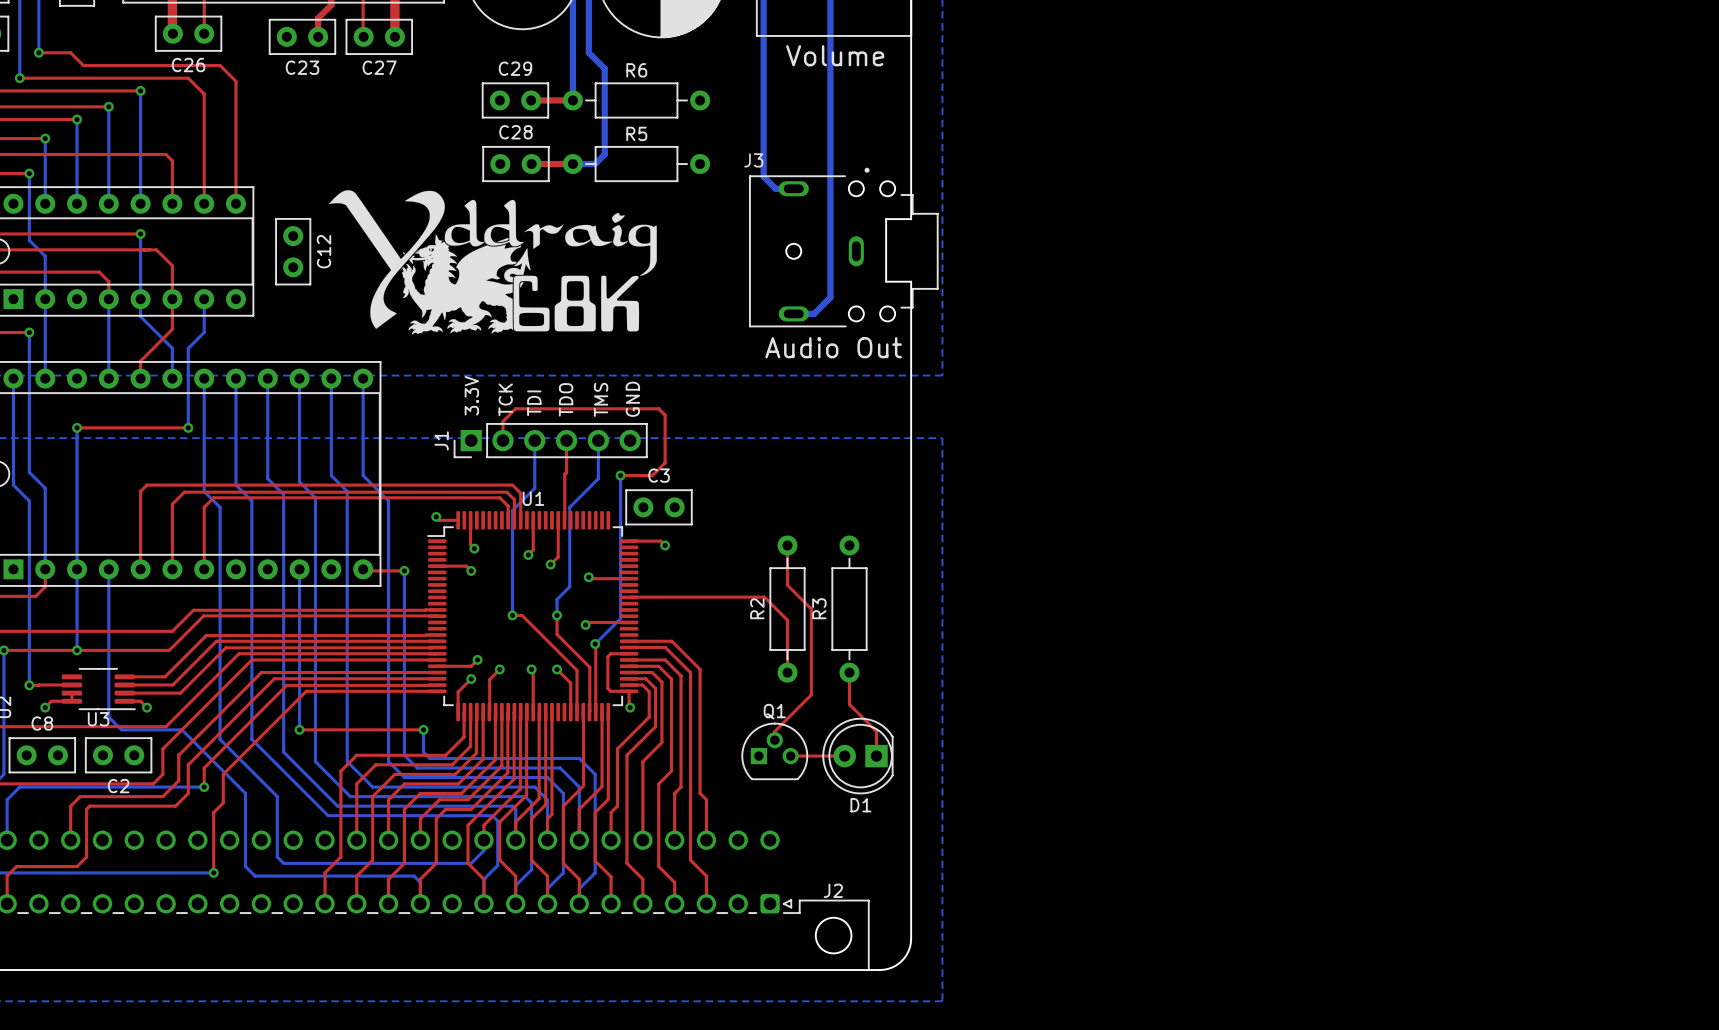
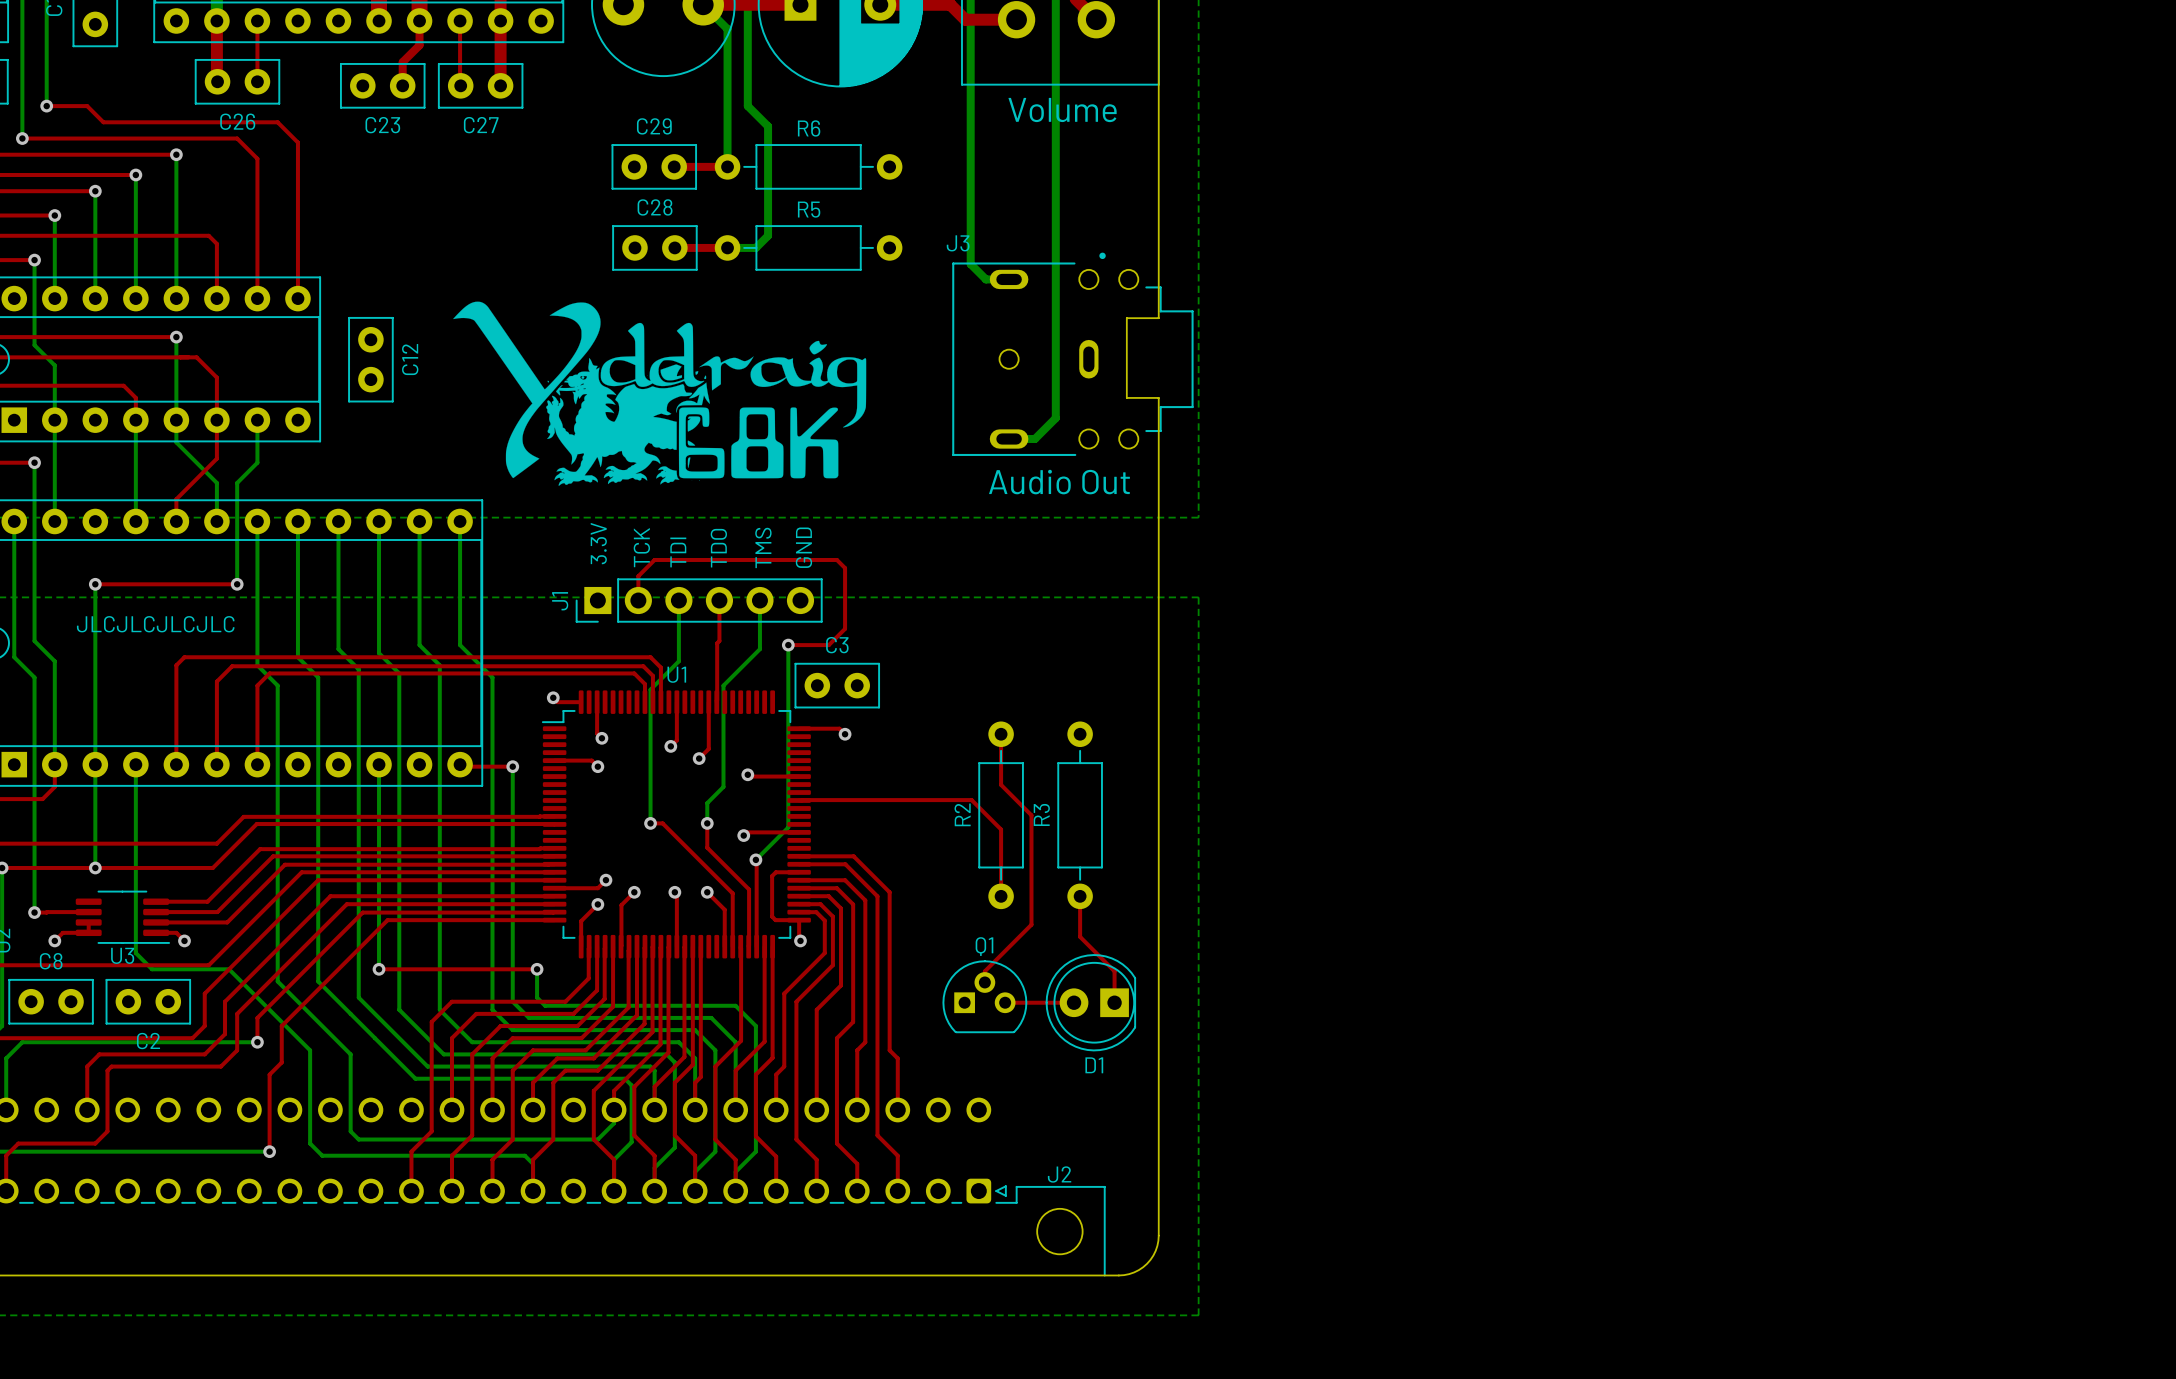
drawing: [328, 190, 657, 335] -> none
drawing: none -> [453, 301, 867, 486]
text: none -> JLCJLCJLCJLC (155, 624)

